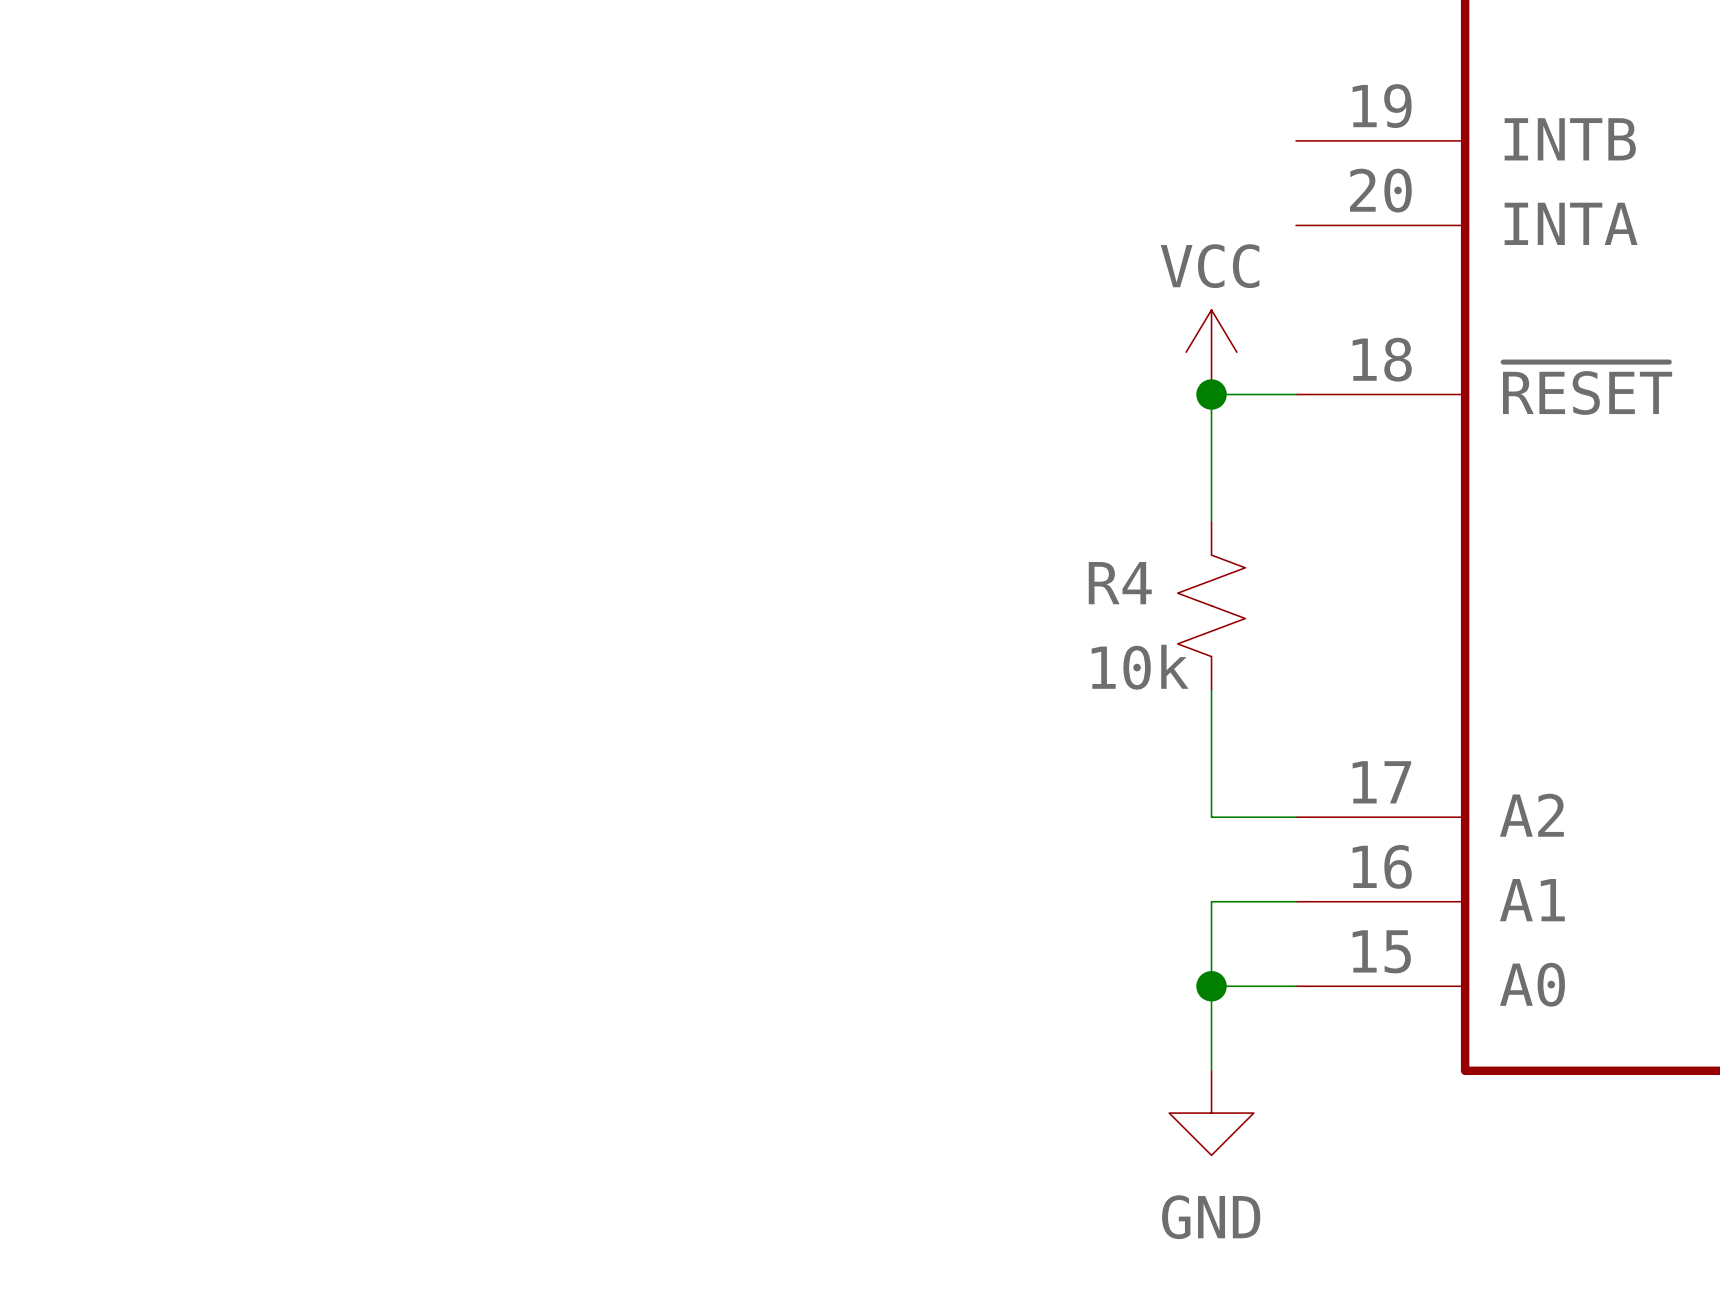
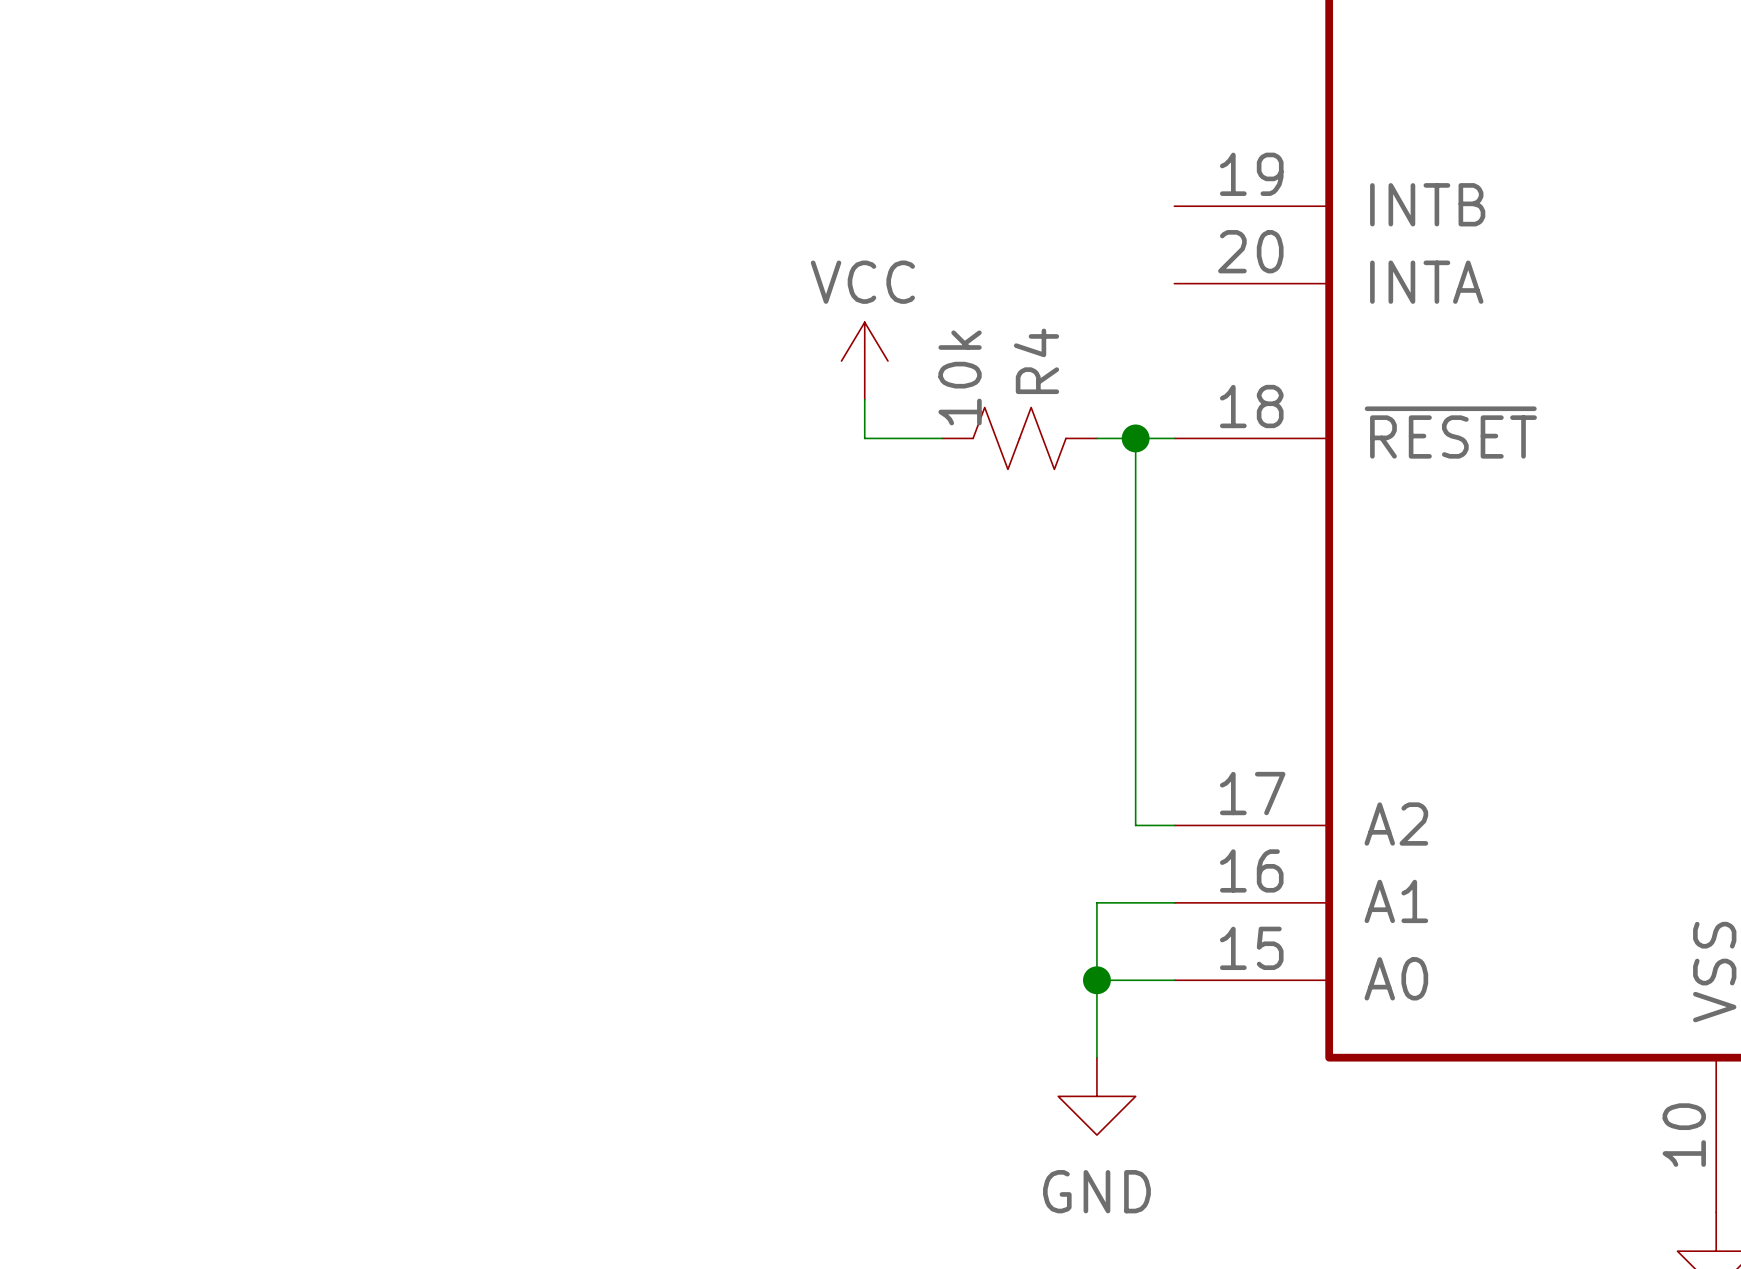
wire: none -> (864, 399) (864, 438) (942, 438)
power symbol position: VCC (1211, 352) -> VCC (864, 361)
wire: (1211, 394) (1211, 521) -> none
junction position: (1211, 394) -> (1135, 438)
R4 rotation: 0° (1211, 605) -> 90° clockwise (1019, 438)
R4 position: (1211, 605) -> (1019, 438)
wire: (1211, 690) (1211, 817) (1253, 817) -> (1135, 438) (1135, 825)

